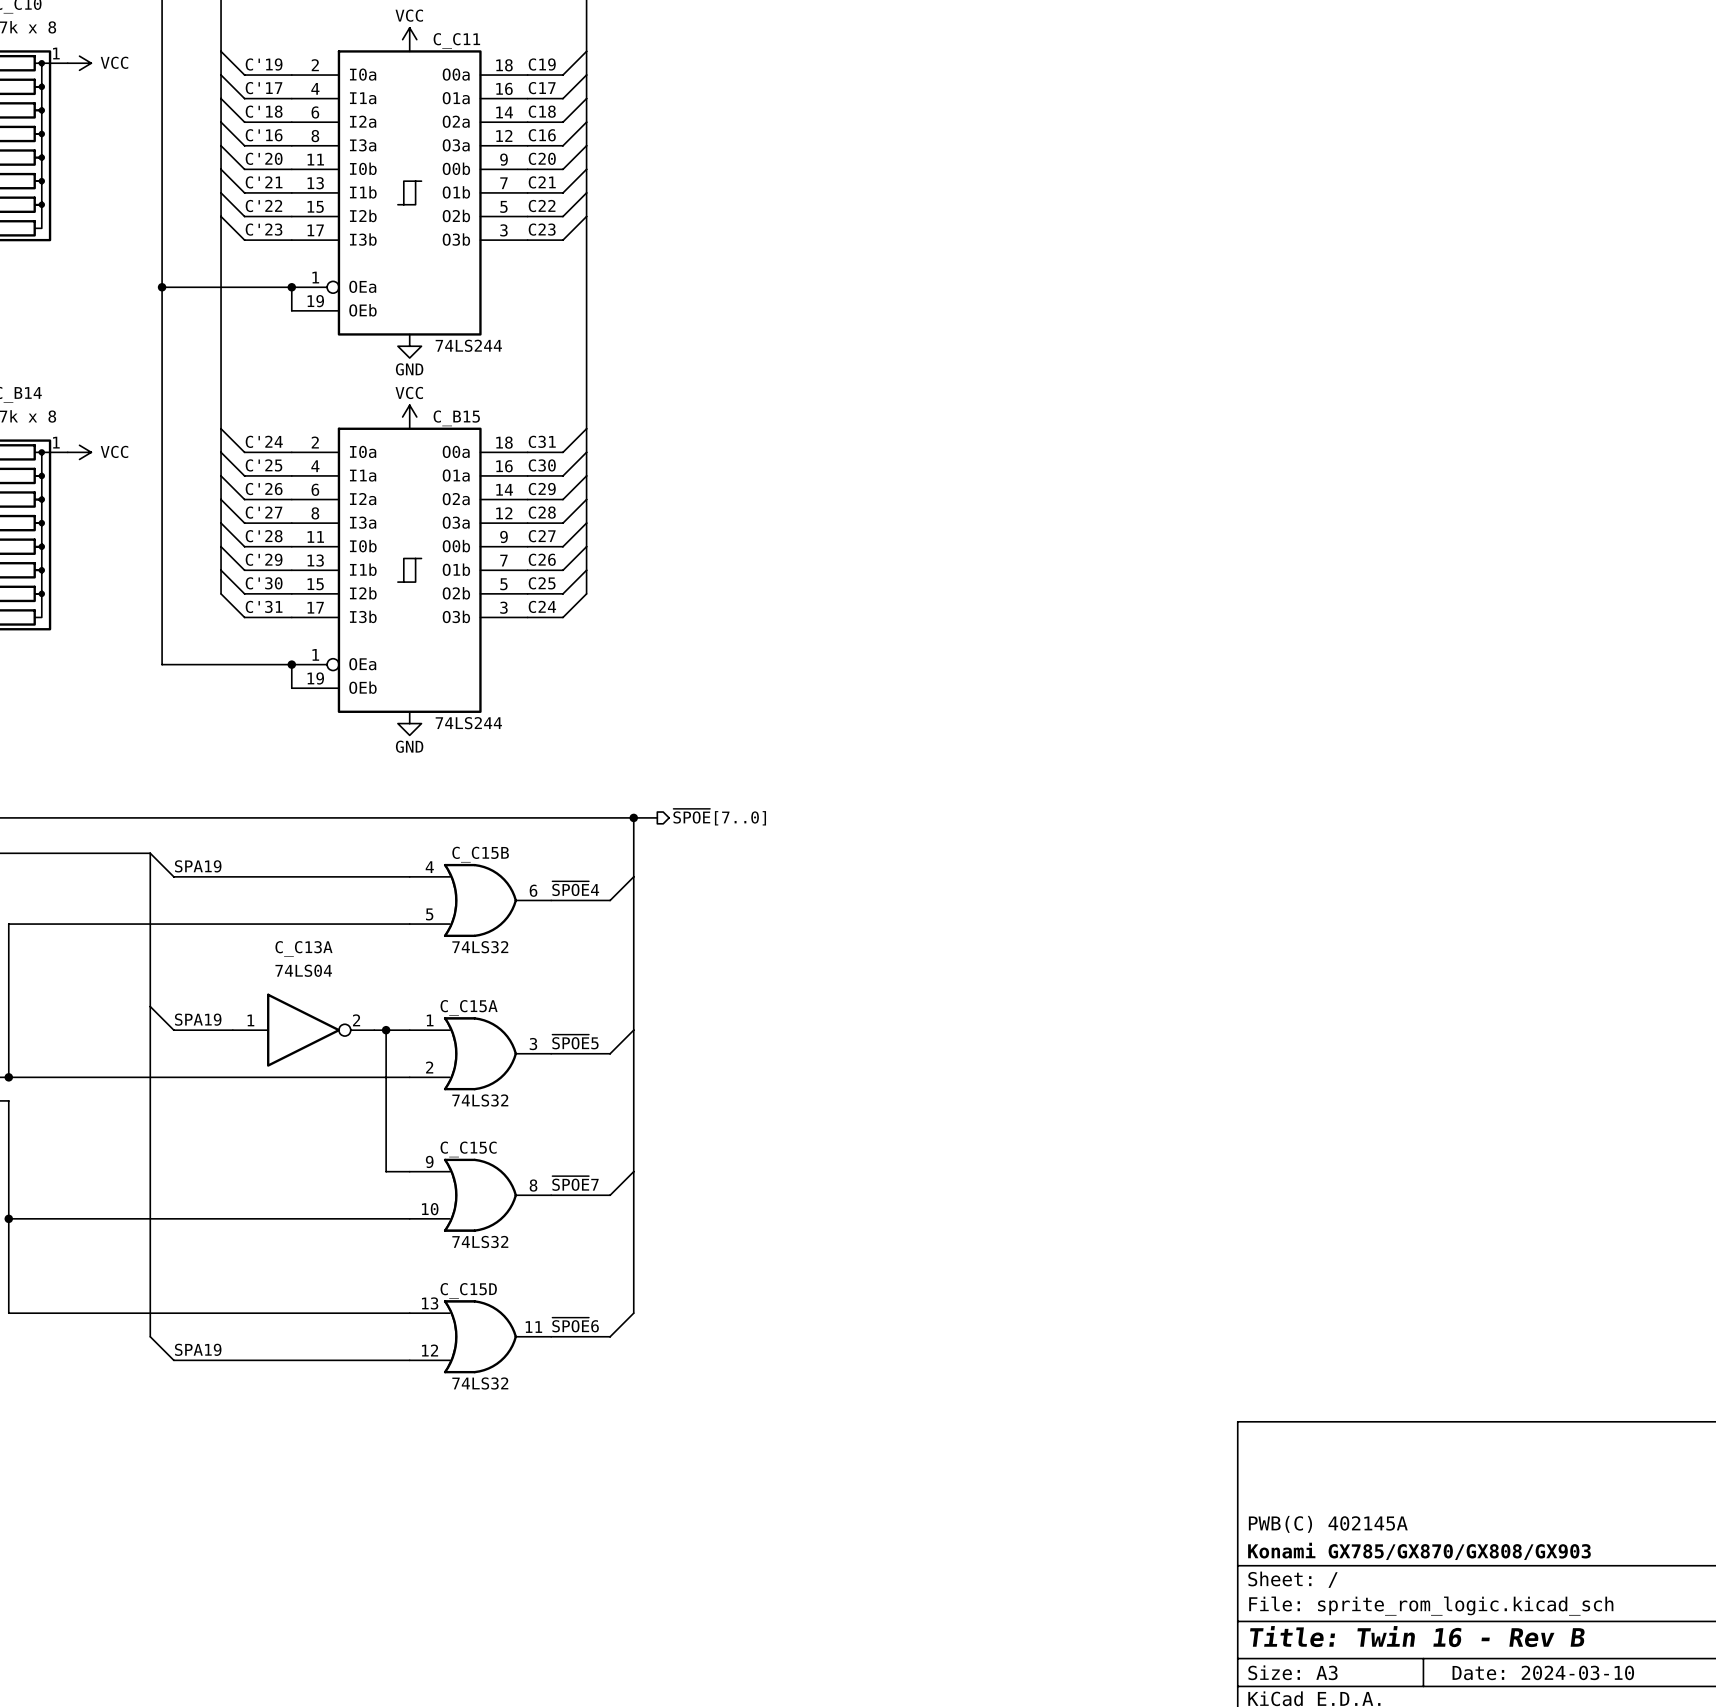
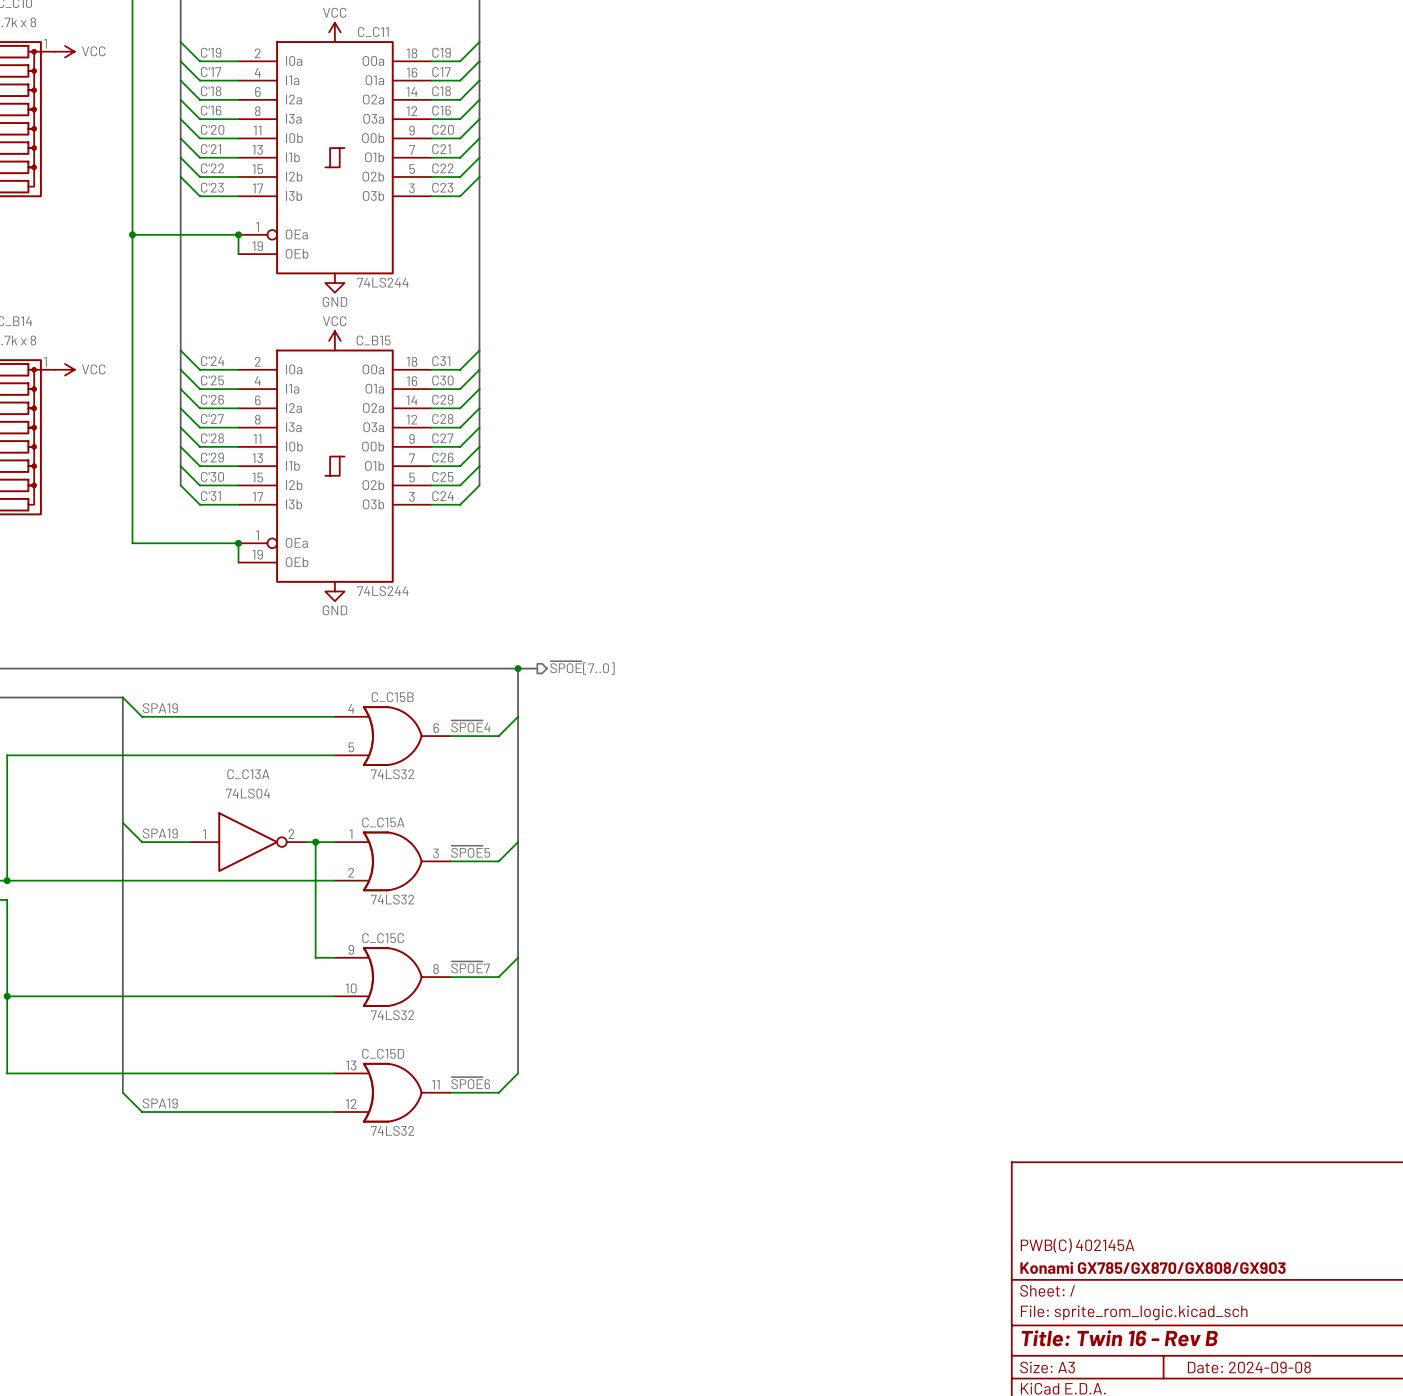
title block: Date: 2024-03-10 (1543, 1672) -> Date: 2024-09-08 (1249, 1367)

